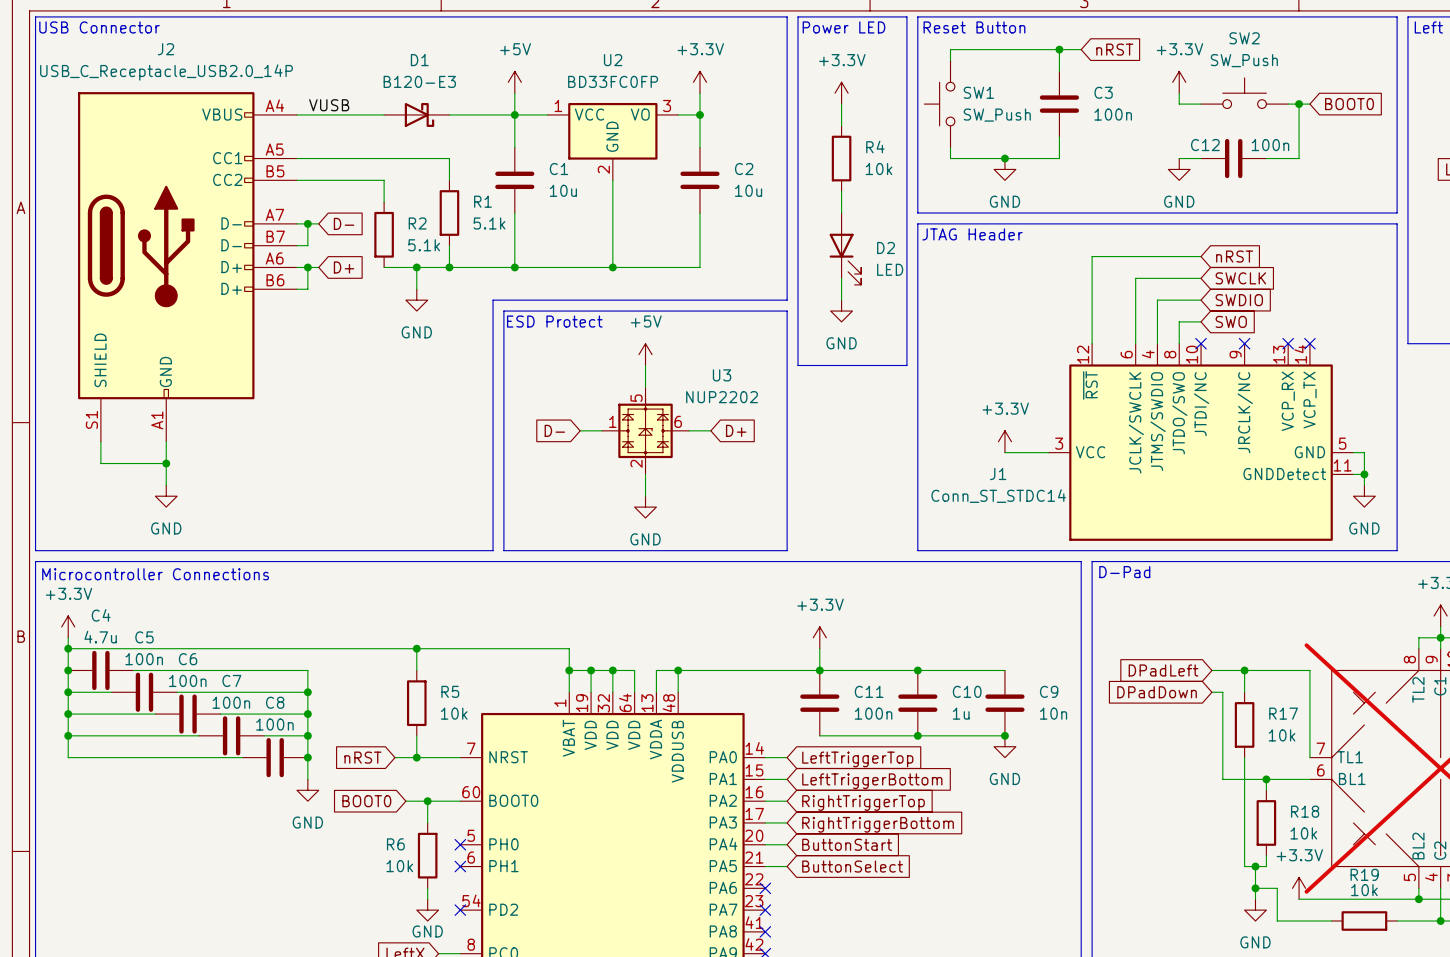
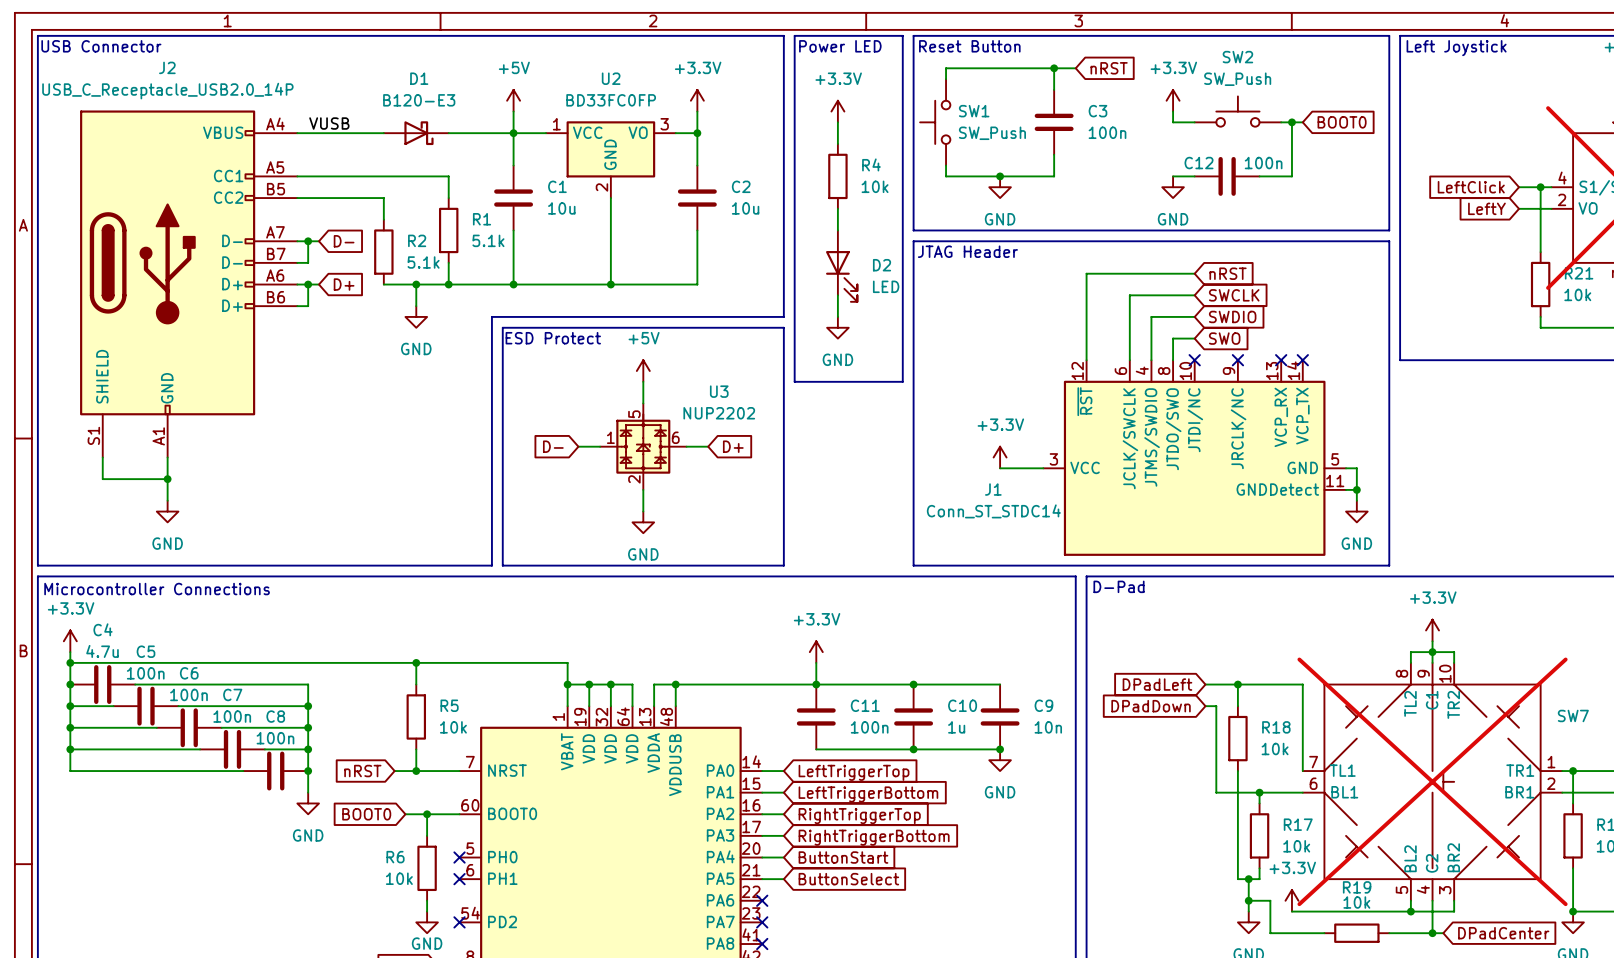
R17 name: R17 (1283, 713) -> R18 (1276, 727)
R18 name: R18 (1305, 811) -> R17 (1298, 824)

